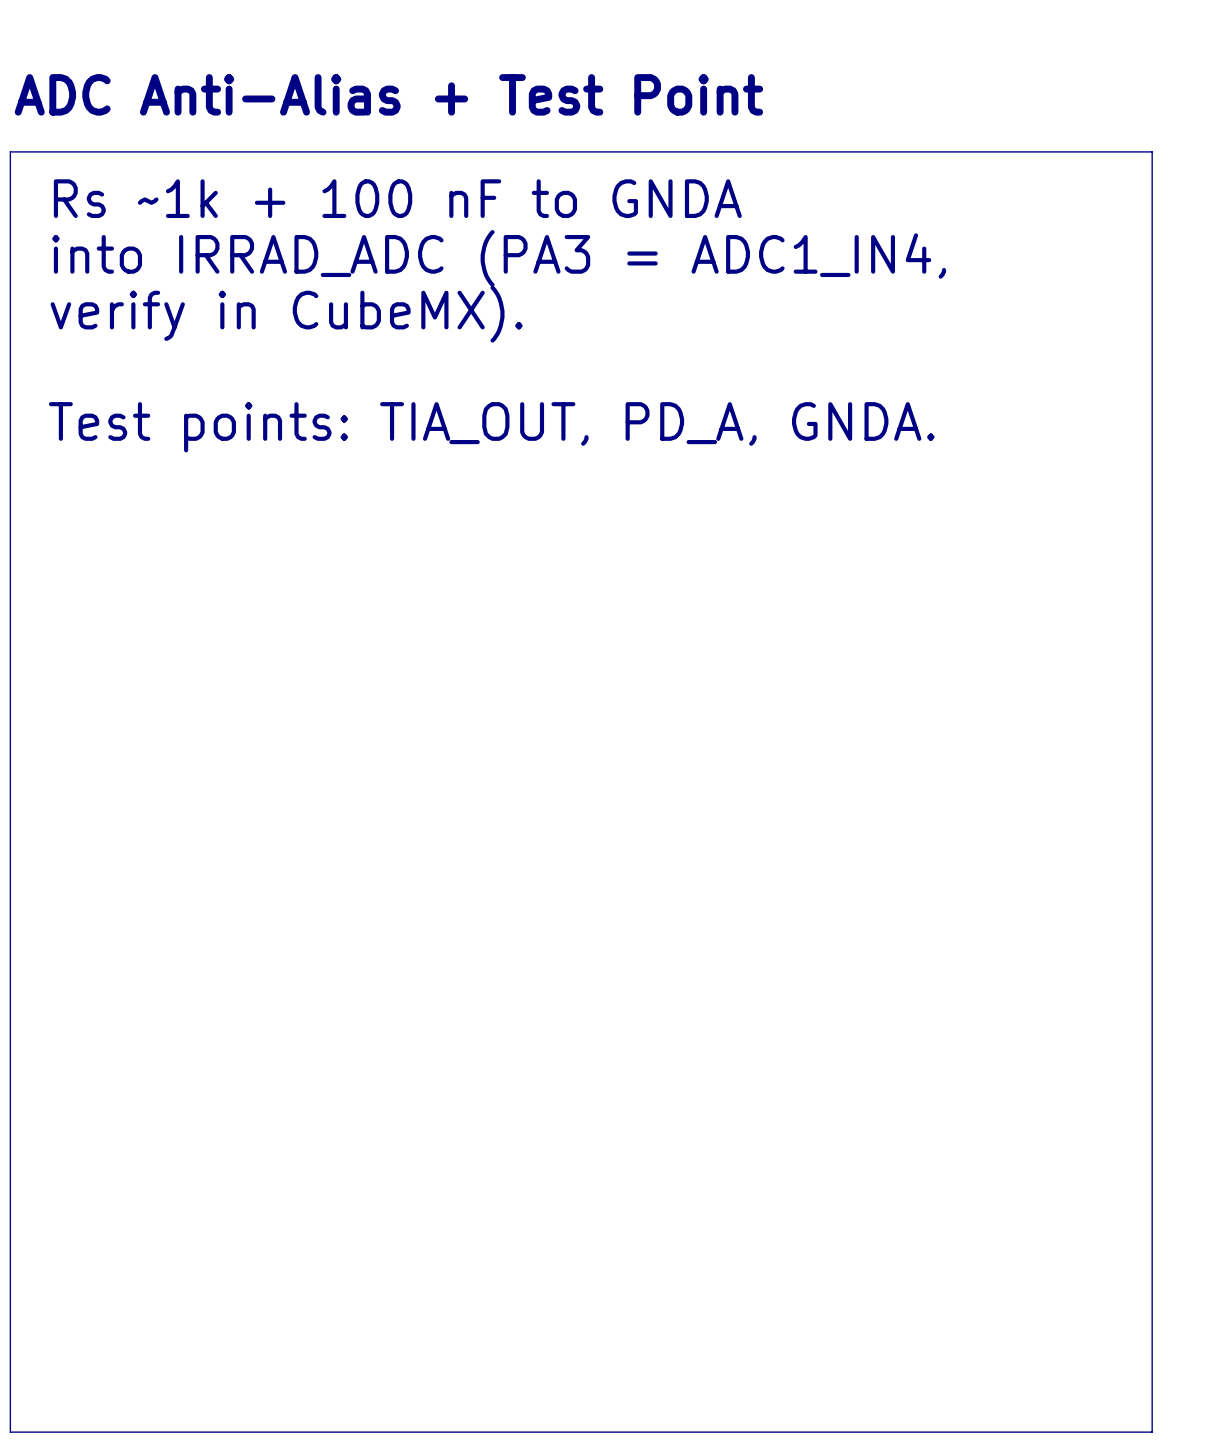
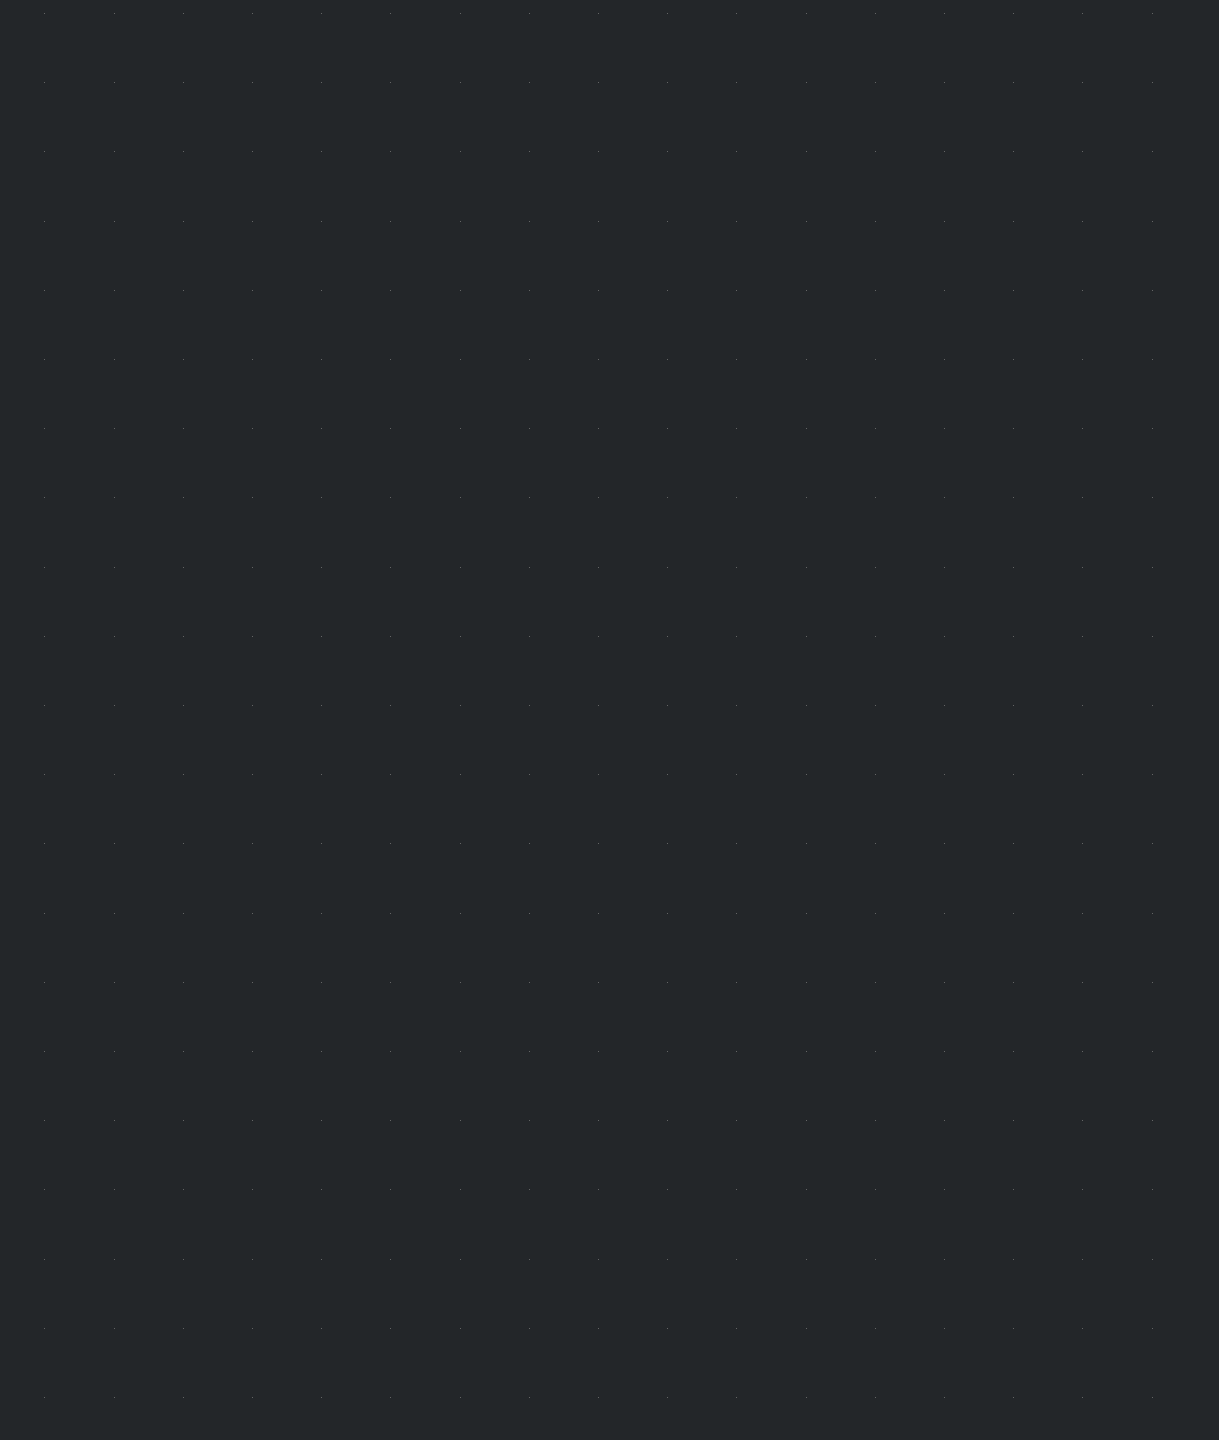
text: ADC Anti-Alias + Test Point (388, 94) -> none
line: (10, 151) (1152, 151) (1152, 1432) (10, 1432) (10, 151) -> none
text: Rs ~1k + 100 nF to GNDA (397, 198) -> none
text: into IRRAD_ADC (PA3 = ADC1_IN4, (499, 258) -> none
text: verify in CubeMX). (286, 314) -> none
text: Test points: TIA_OUT, PD_A, GNDA. (491, 427) -> none

